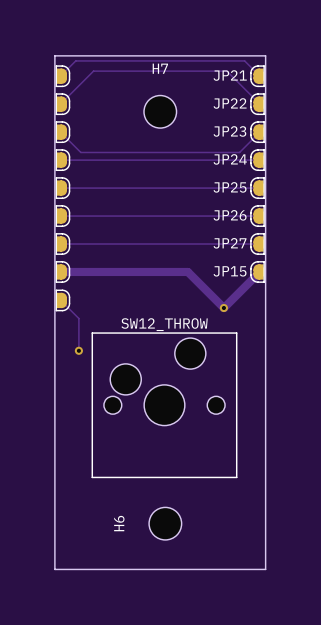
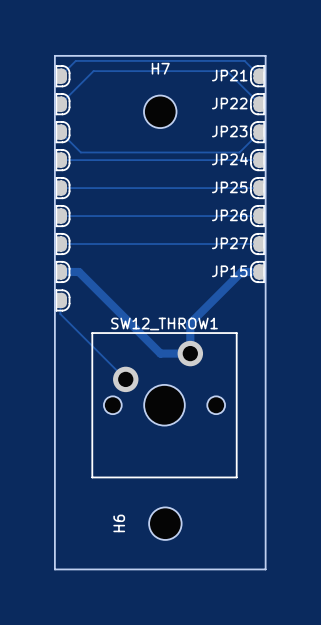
track: (78, 271) (187, 271) (223, 308) (258, 271) -> (78, 271) (160, 353) (190, 353) (190, 323) (241, 271) (259, 271)
track: (60, 300) (78, 318) (78, 350) -> (60, 300) (60, 314) (125, 379)
via: (223, 308) -> none
via: (78, 350) -> none
SW12_THROW: (164, 405) -> none
SW12_THROW1: none -> (164, 405)

